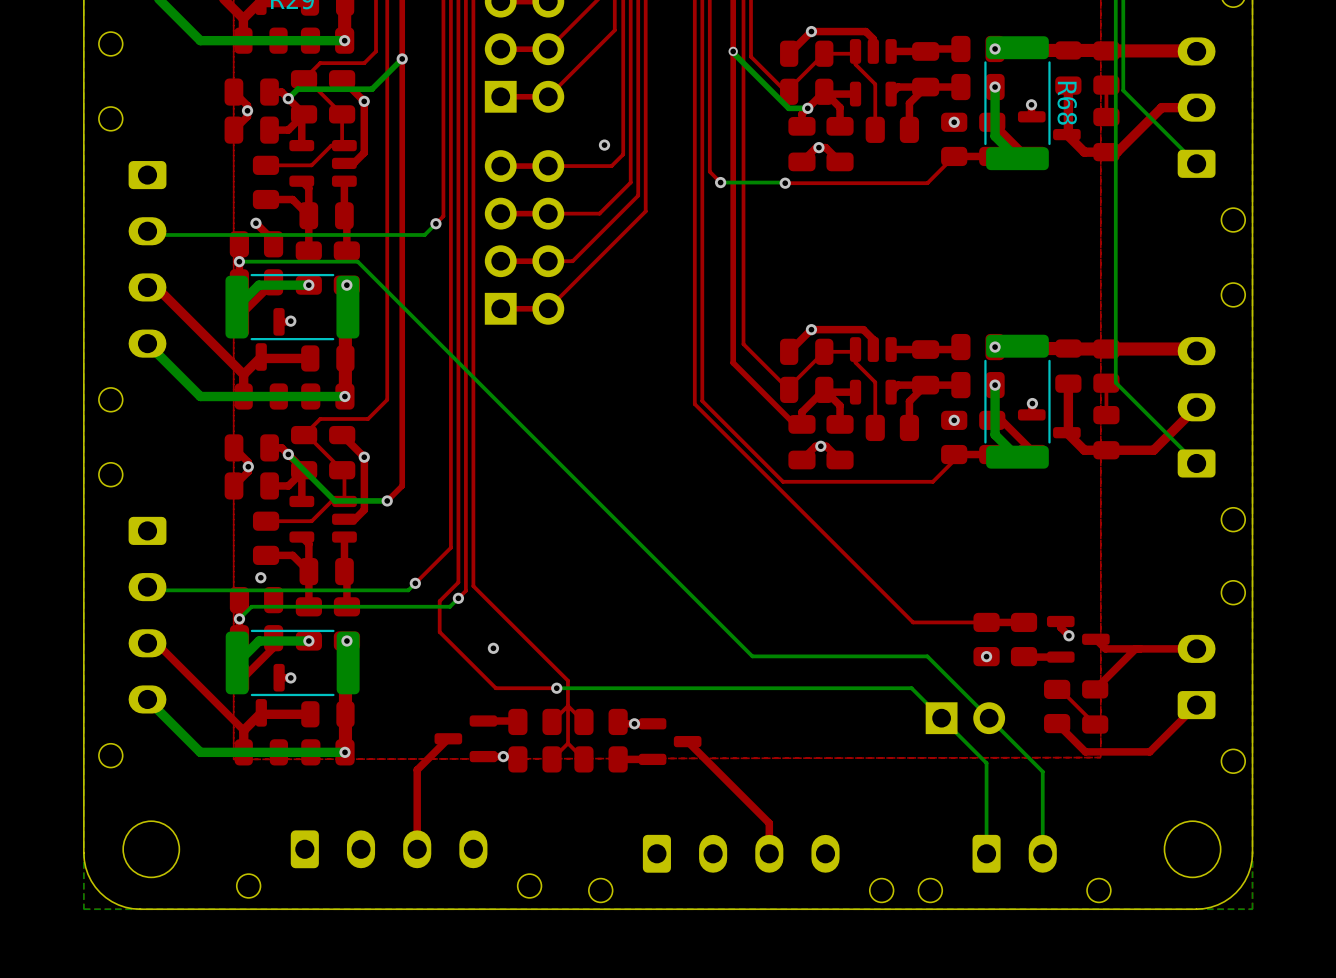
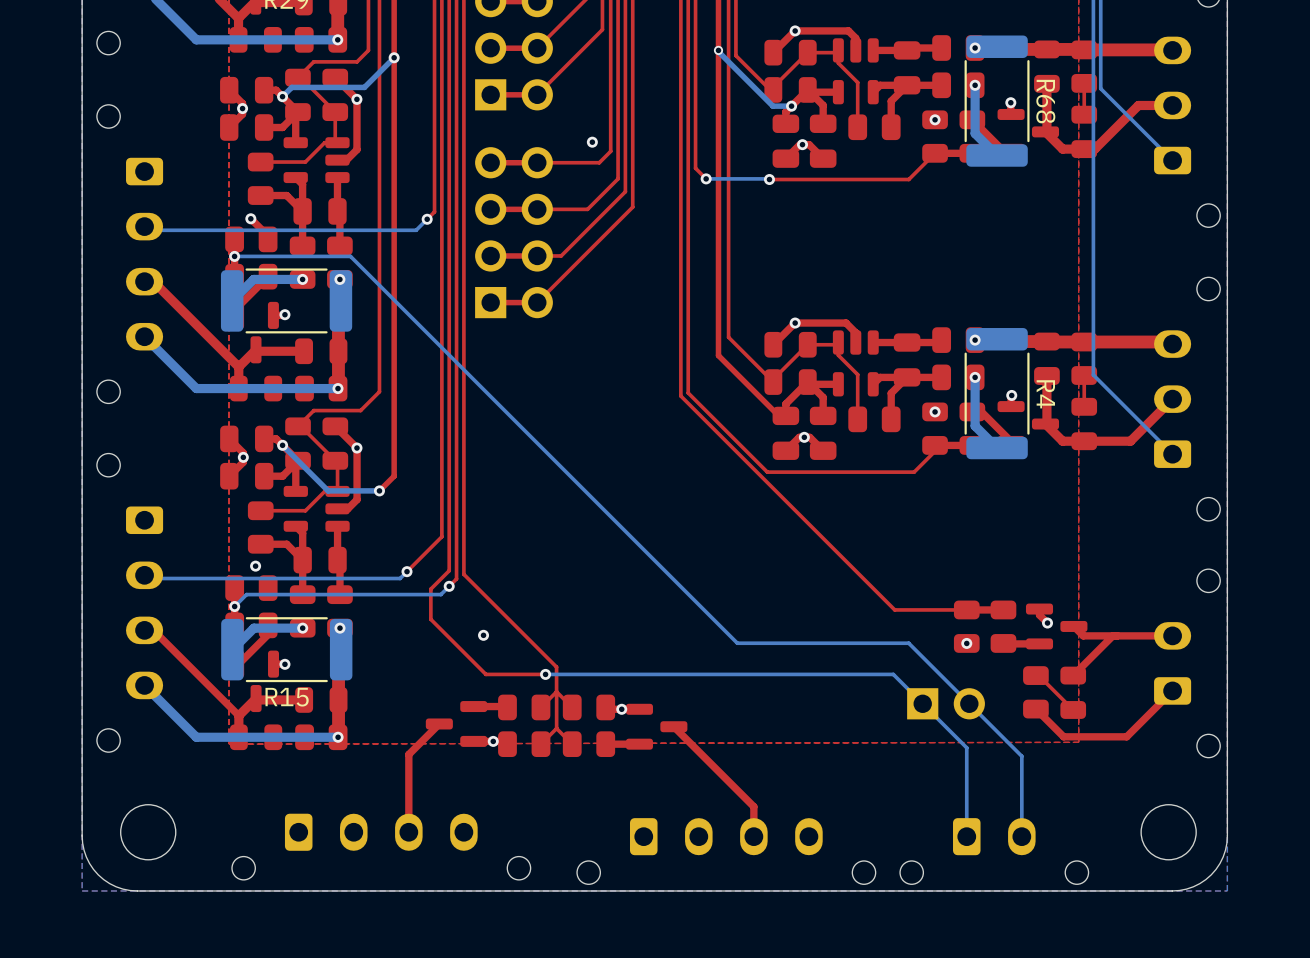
R4 name: none -> R4 (1045, 394)
R15 name: none -> R15 (287, 697)

